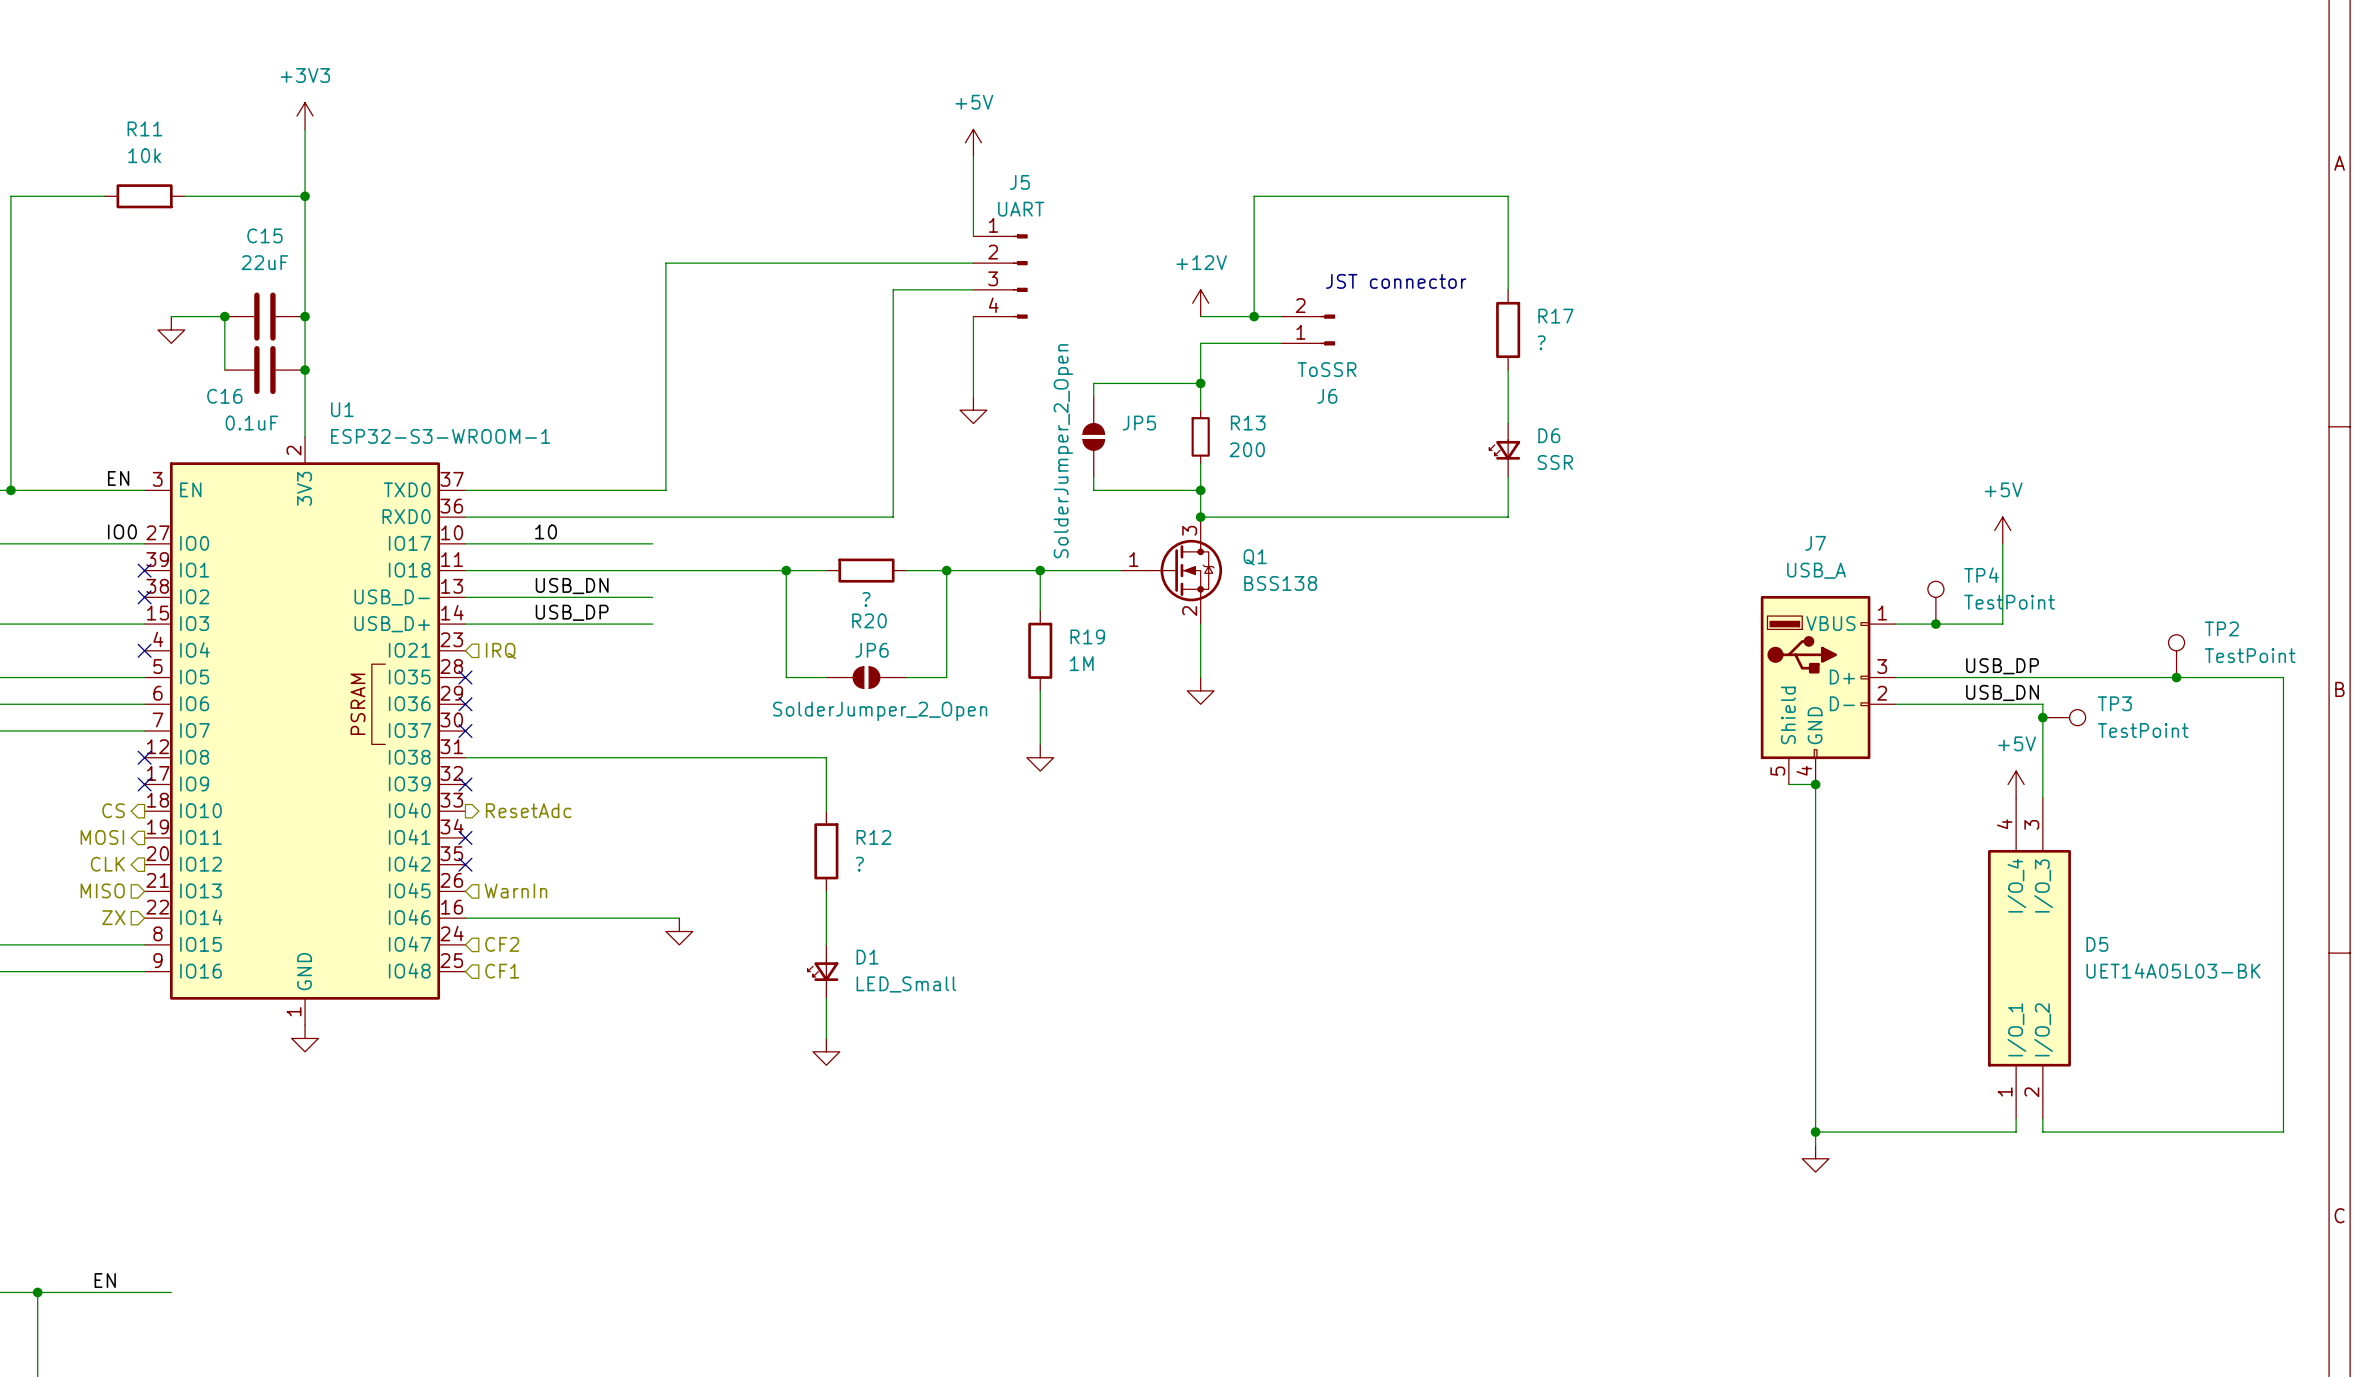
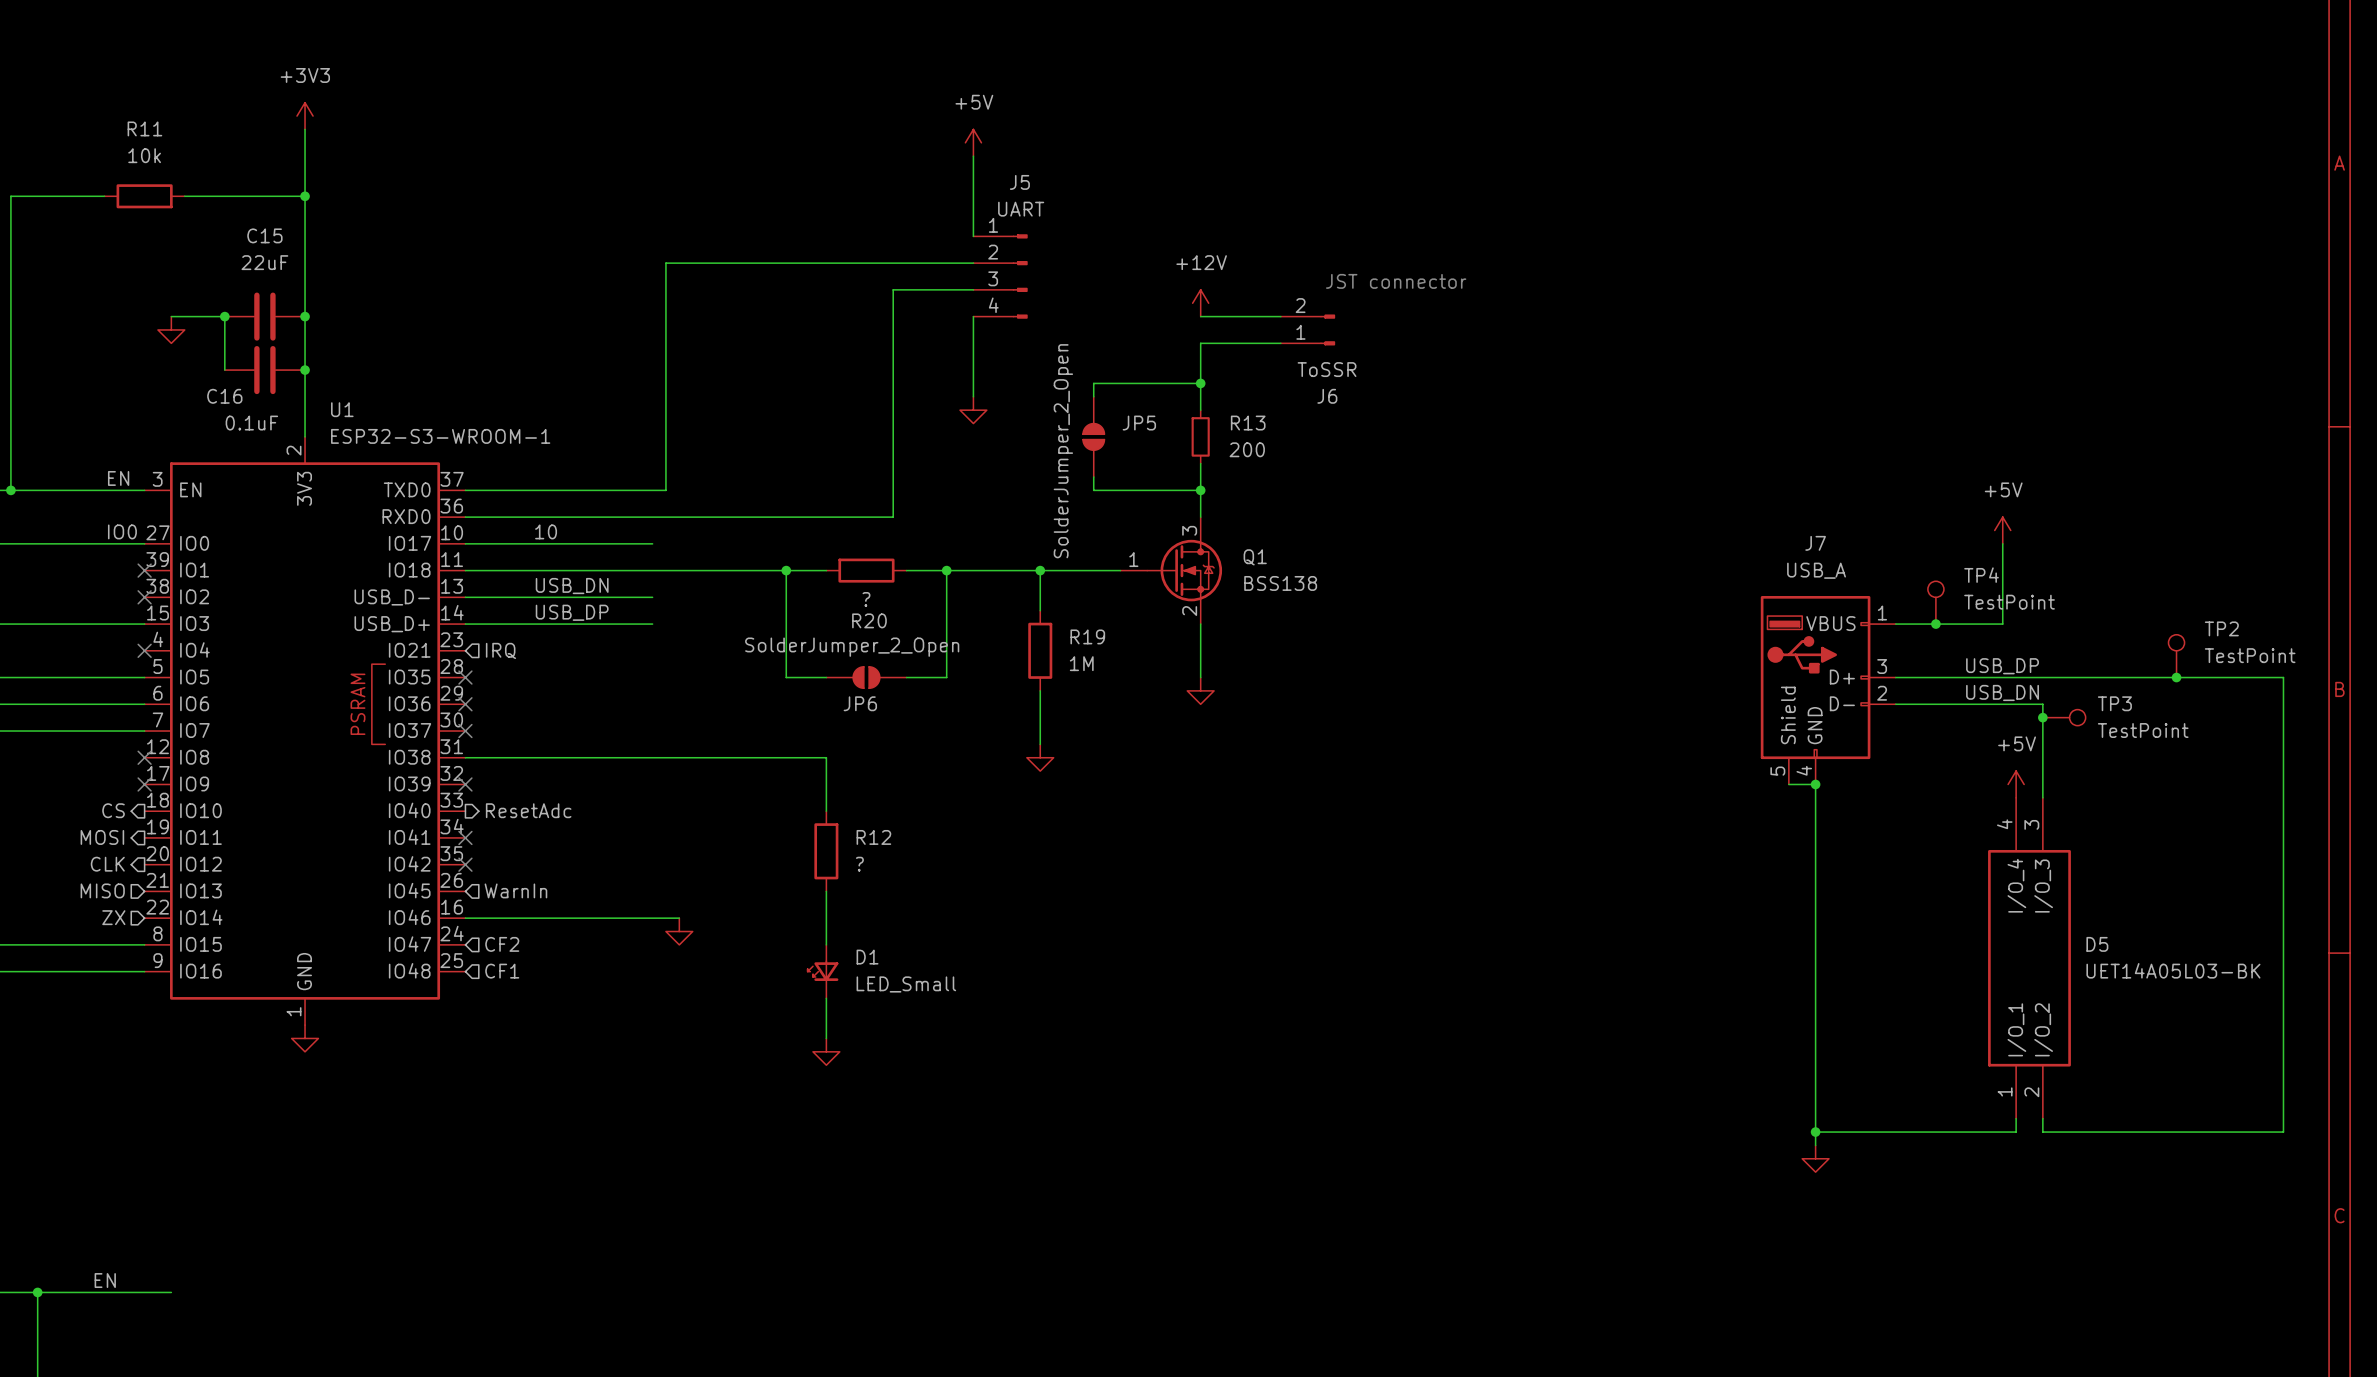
wire: (1508, 289) (1508, 196) (1254, 196) (1254, 316) -> none
junction: (1254, 316) -> none
R17: ? (1508, 329) -> none
wire: (1508, 370) (1508, 423) -> none
D6: SSR (1504, 450) -> none
wire: (1508, 477) (1508, 517) (1200, 517) -> none
junction: (1200, 517) -> none
JP6 name position: JP6 (871, 650) -> JP6 (860, 703)
JP6 value position: SolderJumper_2_Open (880, 711) -> SolderJumper_2_Open (852, 647)

